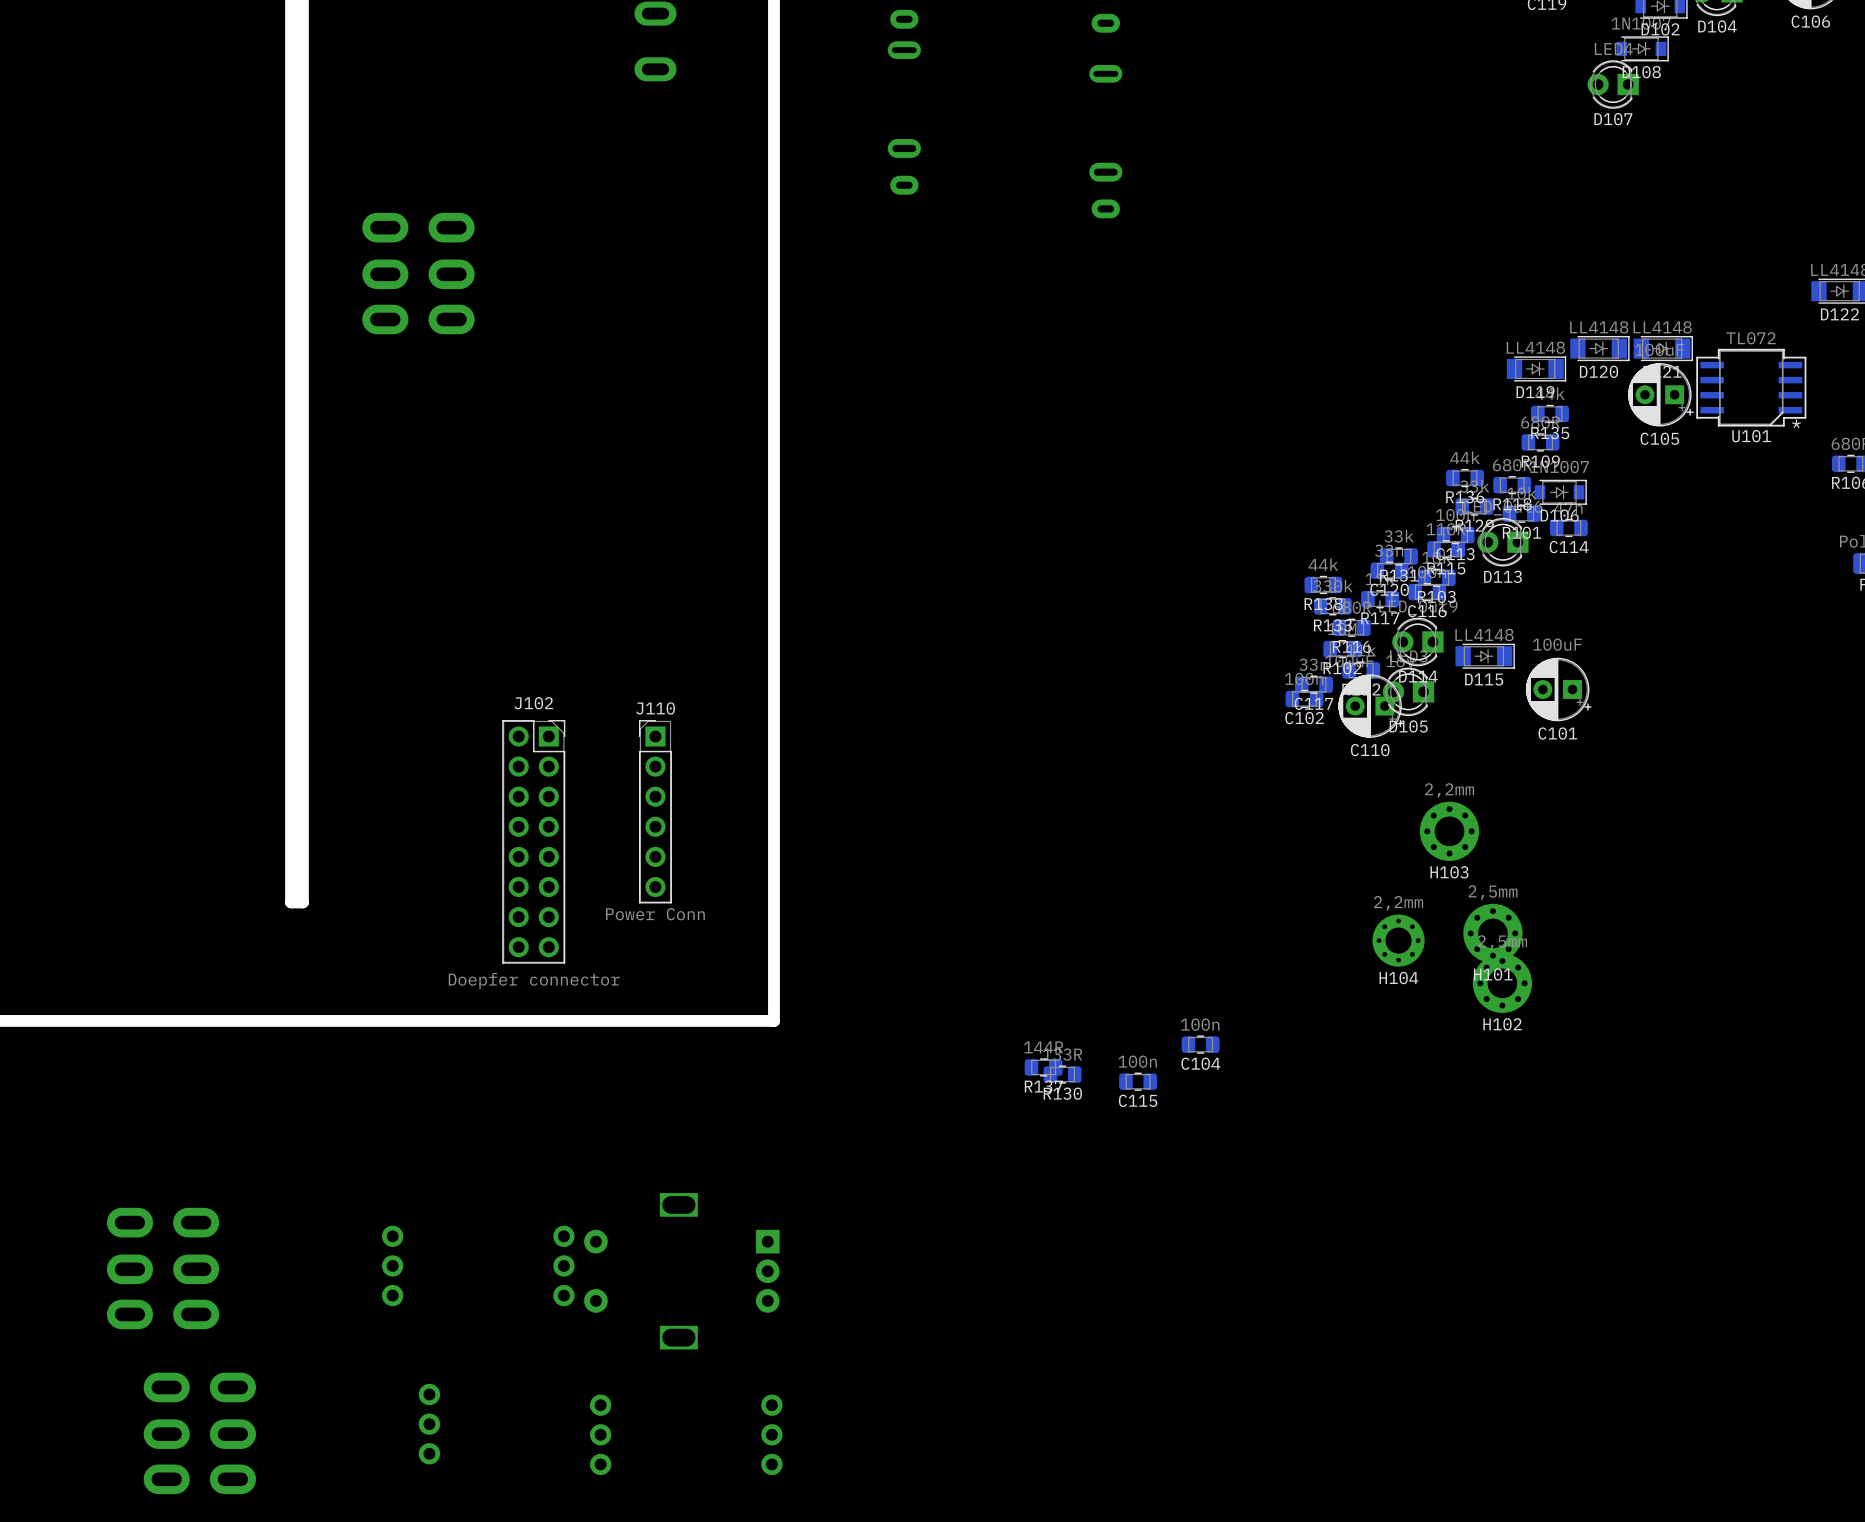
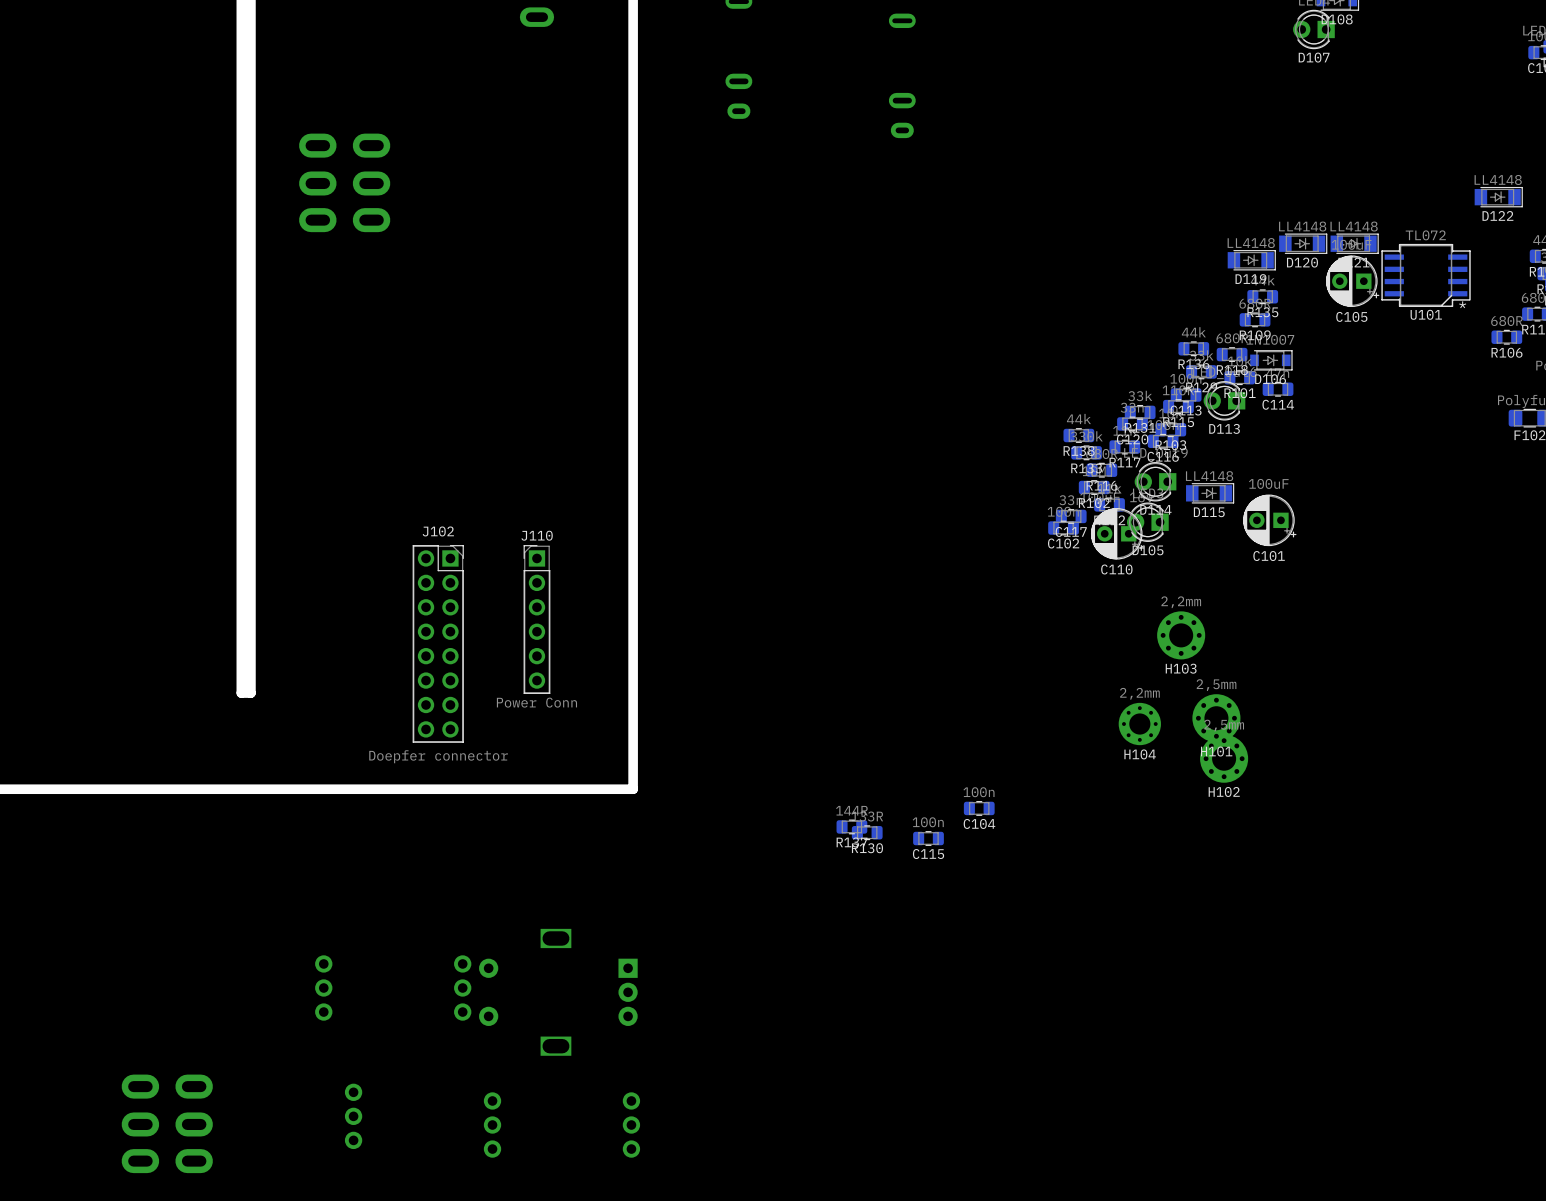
part: (163, 1268) -> none

